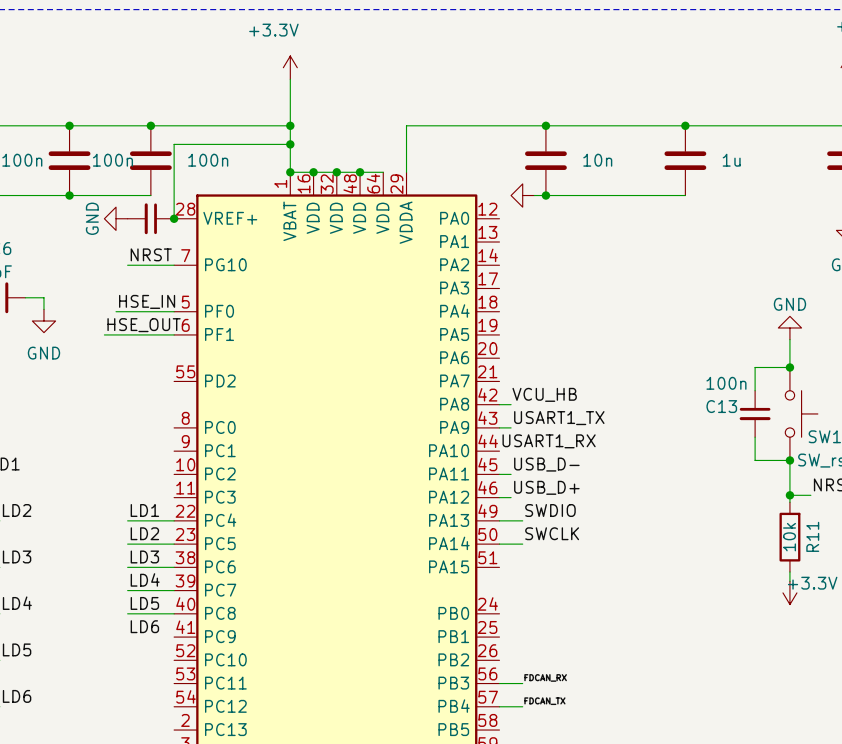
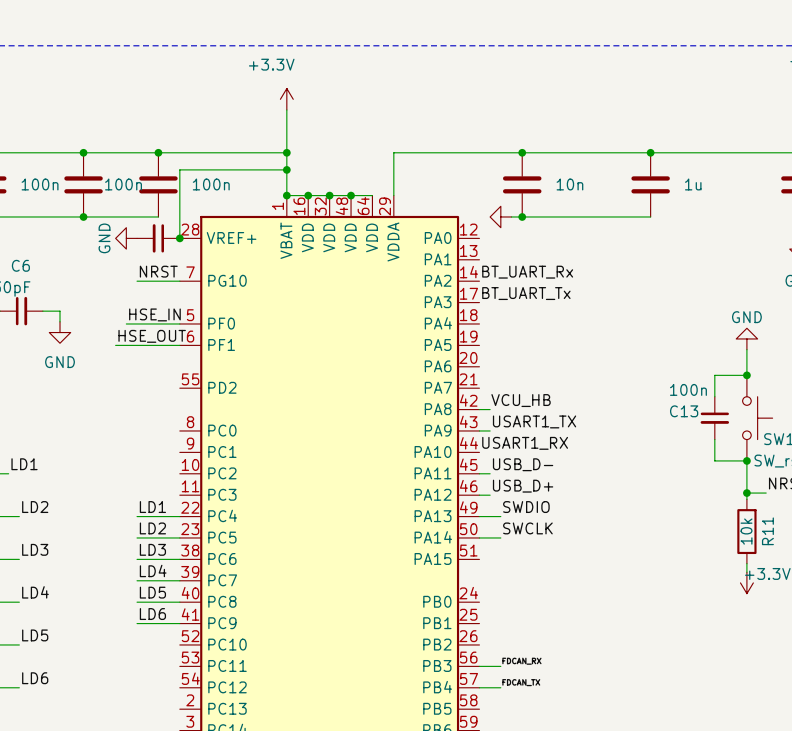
label: none -> BT_UART_Rx (527, 272)
label: none -> BT_UART_Tx (526, 293)
wire: none -> (137, 623) (179, 623)

